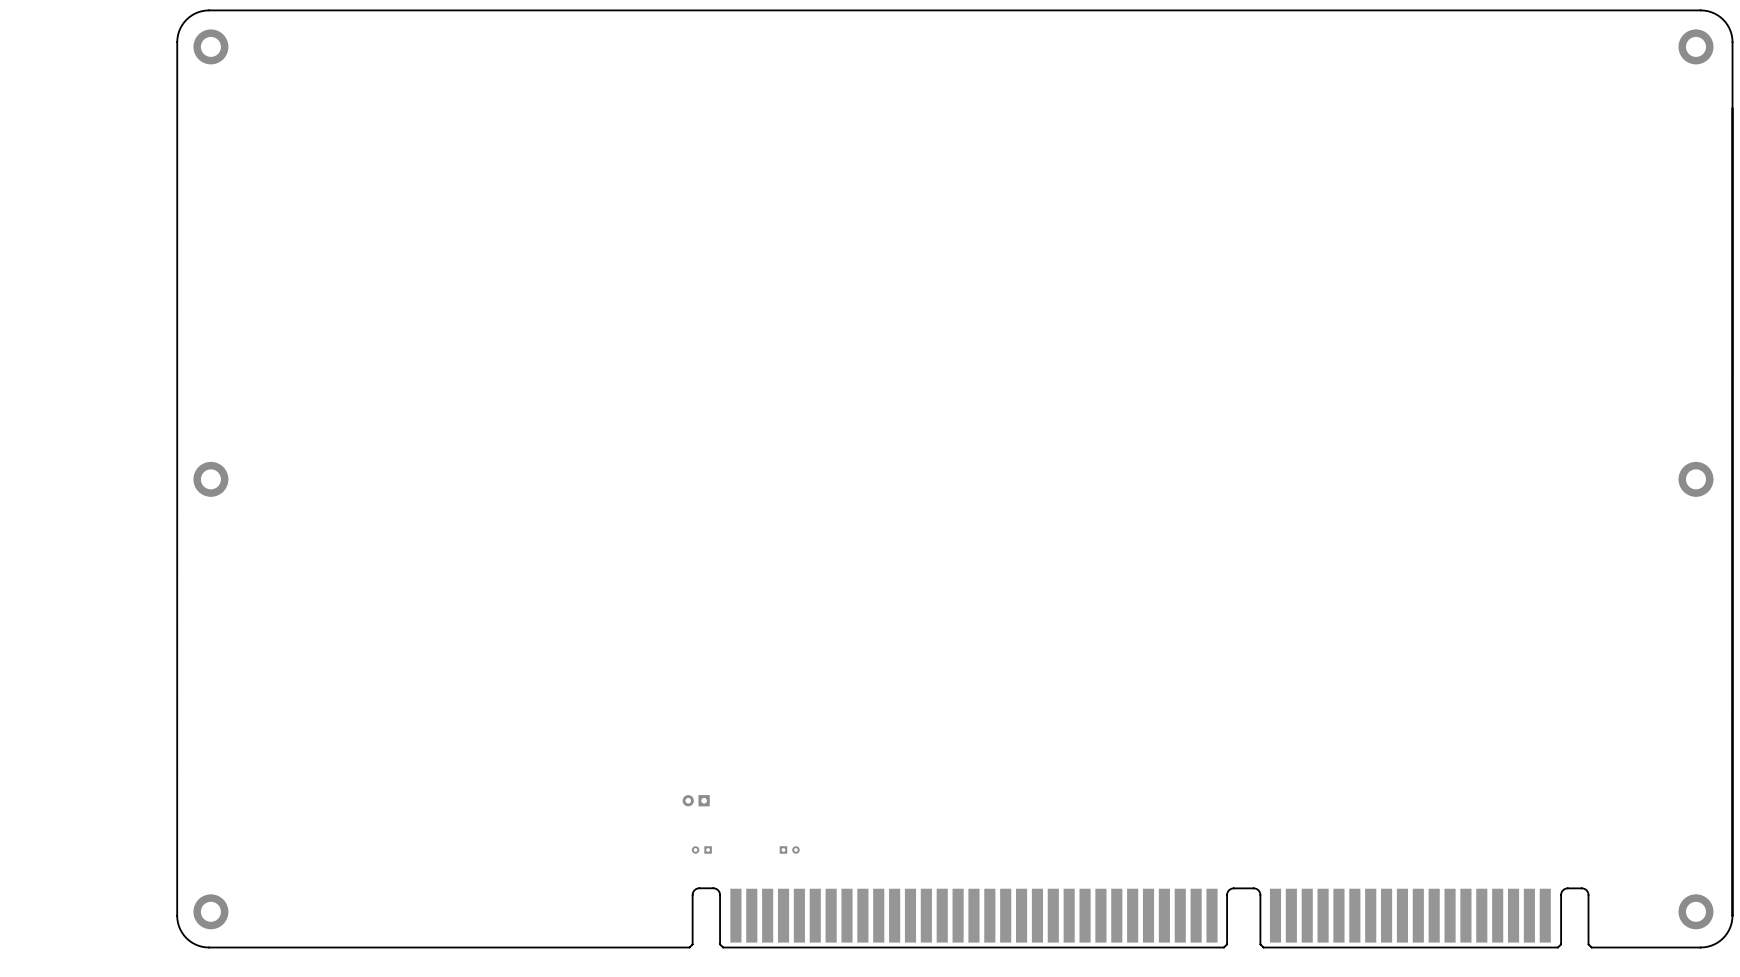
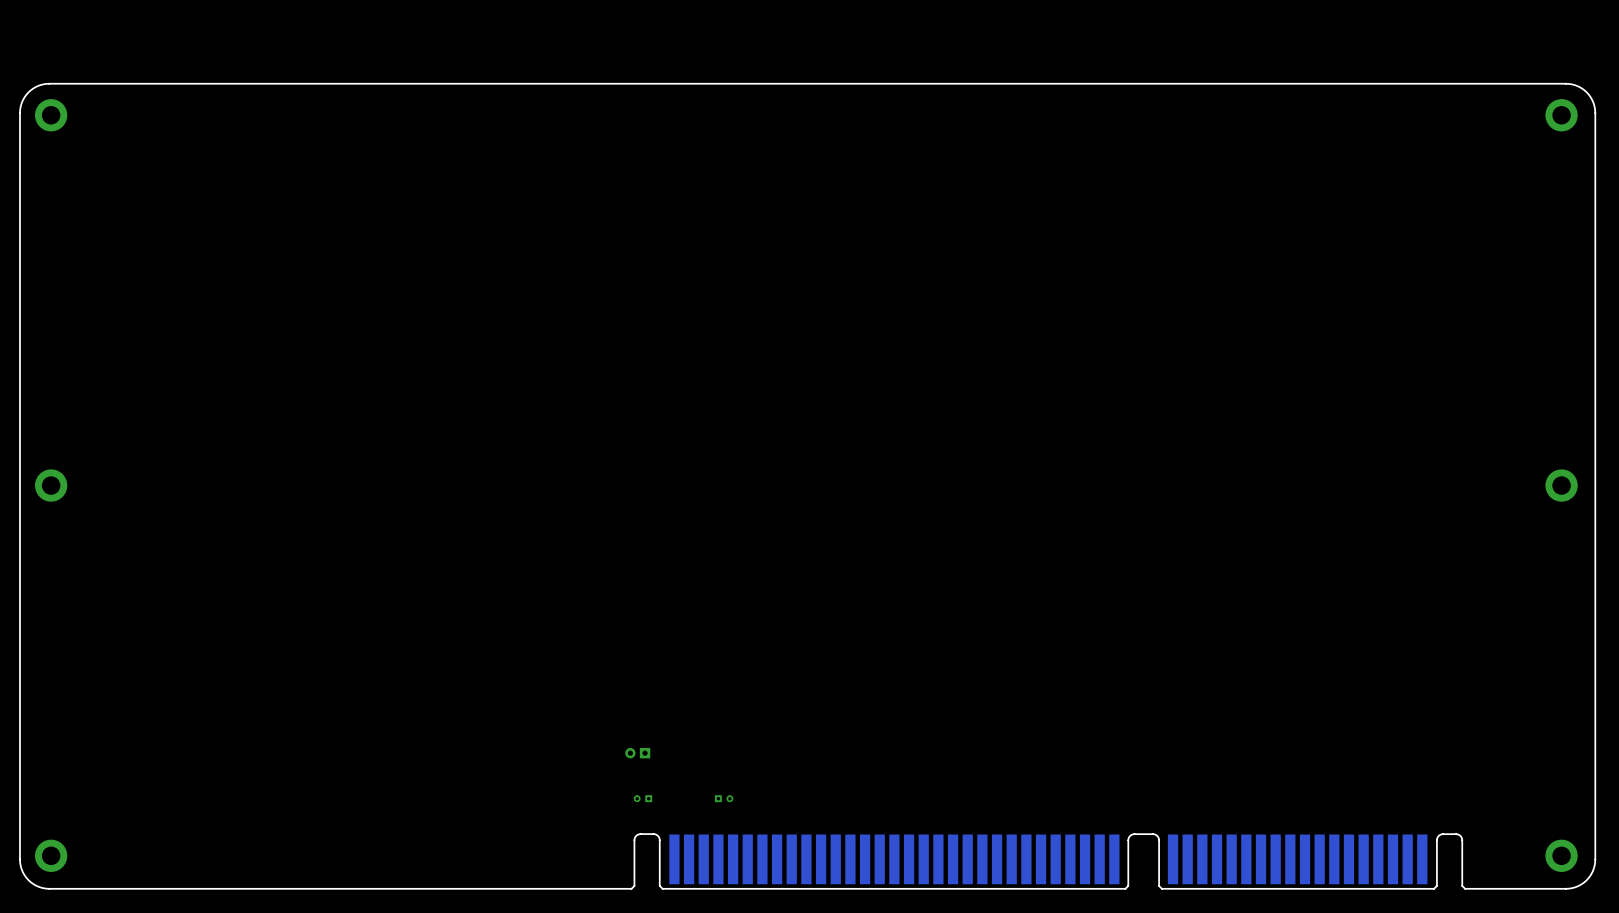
part: (210, 46) -> none
part position: (1695, 46) -> (1561, 115)
part: none -> (51, 115)
part position: (210, 479) -> (51, 485)
part position: (1695, 479) -> (1561, 485)
part position: (210, 911) -> (51, 855)
board edge: (1732, 915) (1732, 42) (1729, 28) (1717, 15) (1700, 10) (208, 10) (195, 13) (186, 19) (179, 31) (177, 42) (177, 915) (180, 929) (186, 938) (198, 945) (208, 947) -> (1595, 113) (1592, 100) (1586, 92) (1578, 86) (1565, 83) (49, 83) (36, 86) (24, 97) (19, 113) (20, 866) (24, 875) (31, 882) (46, 888) (187, 888)

